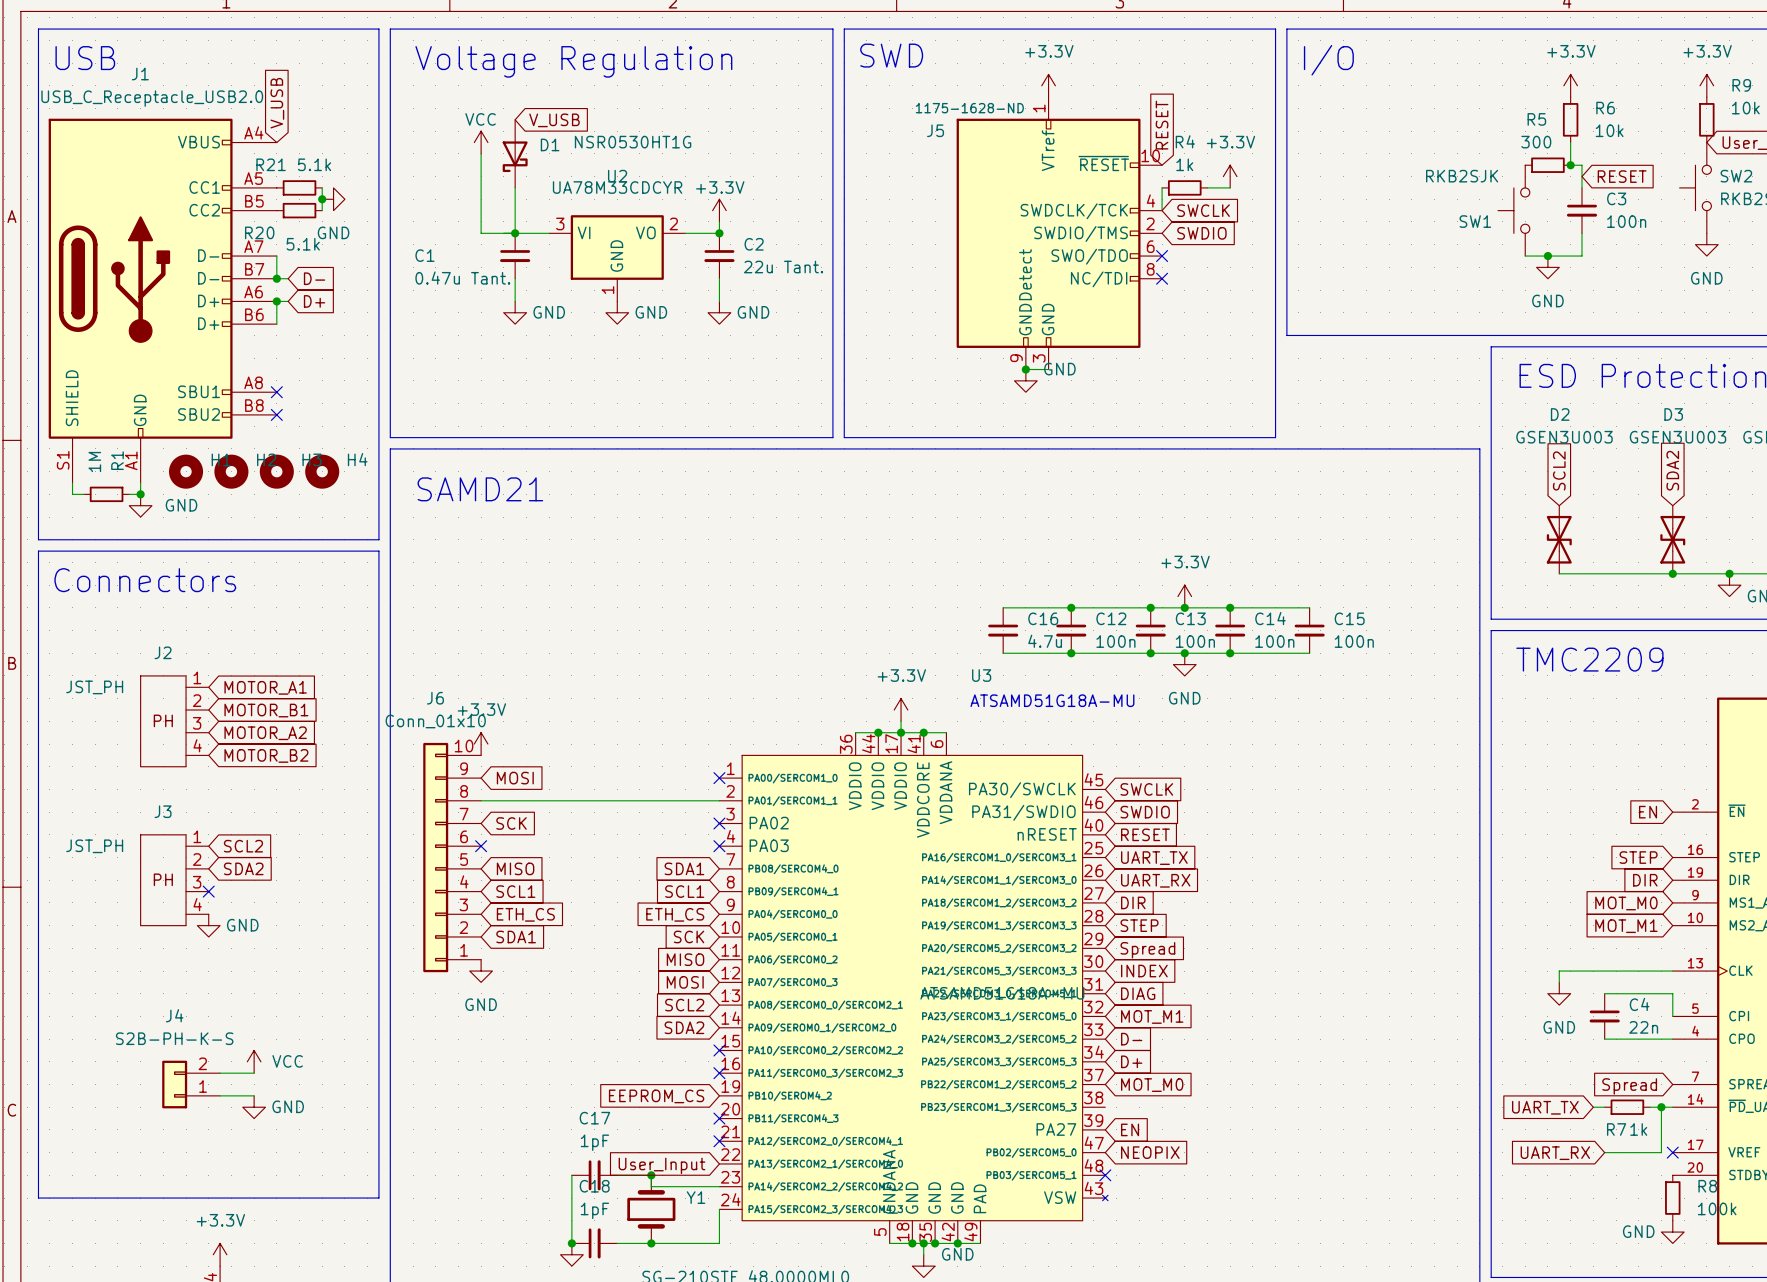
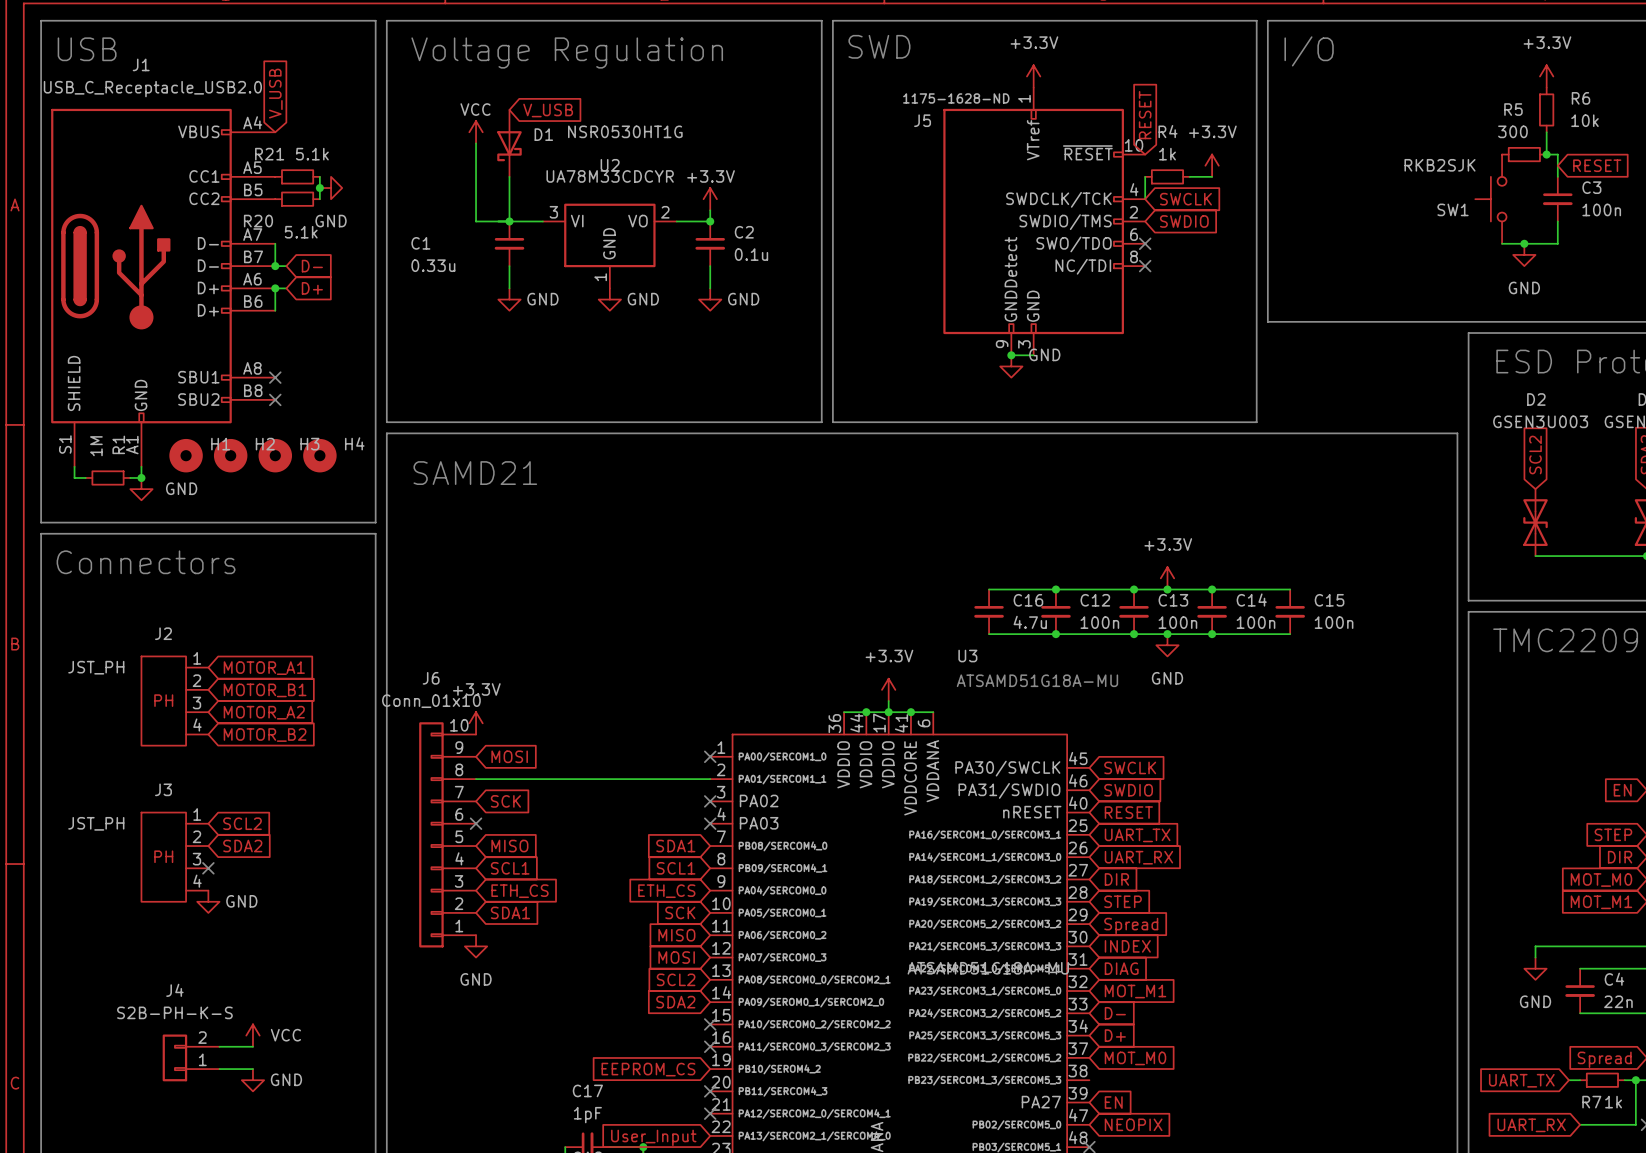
C2 value: 22u Tant. (783, 267) -> 0.1u (751, 254)
C1 value: 0.47u Tant. (462, 278) -> 0.33u (433, 265)

